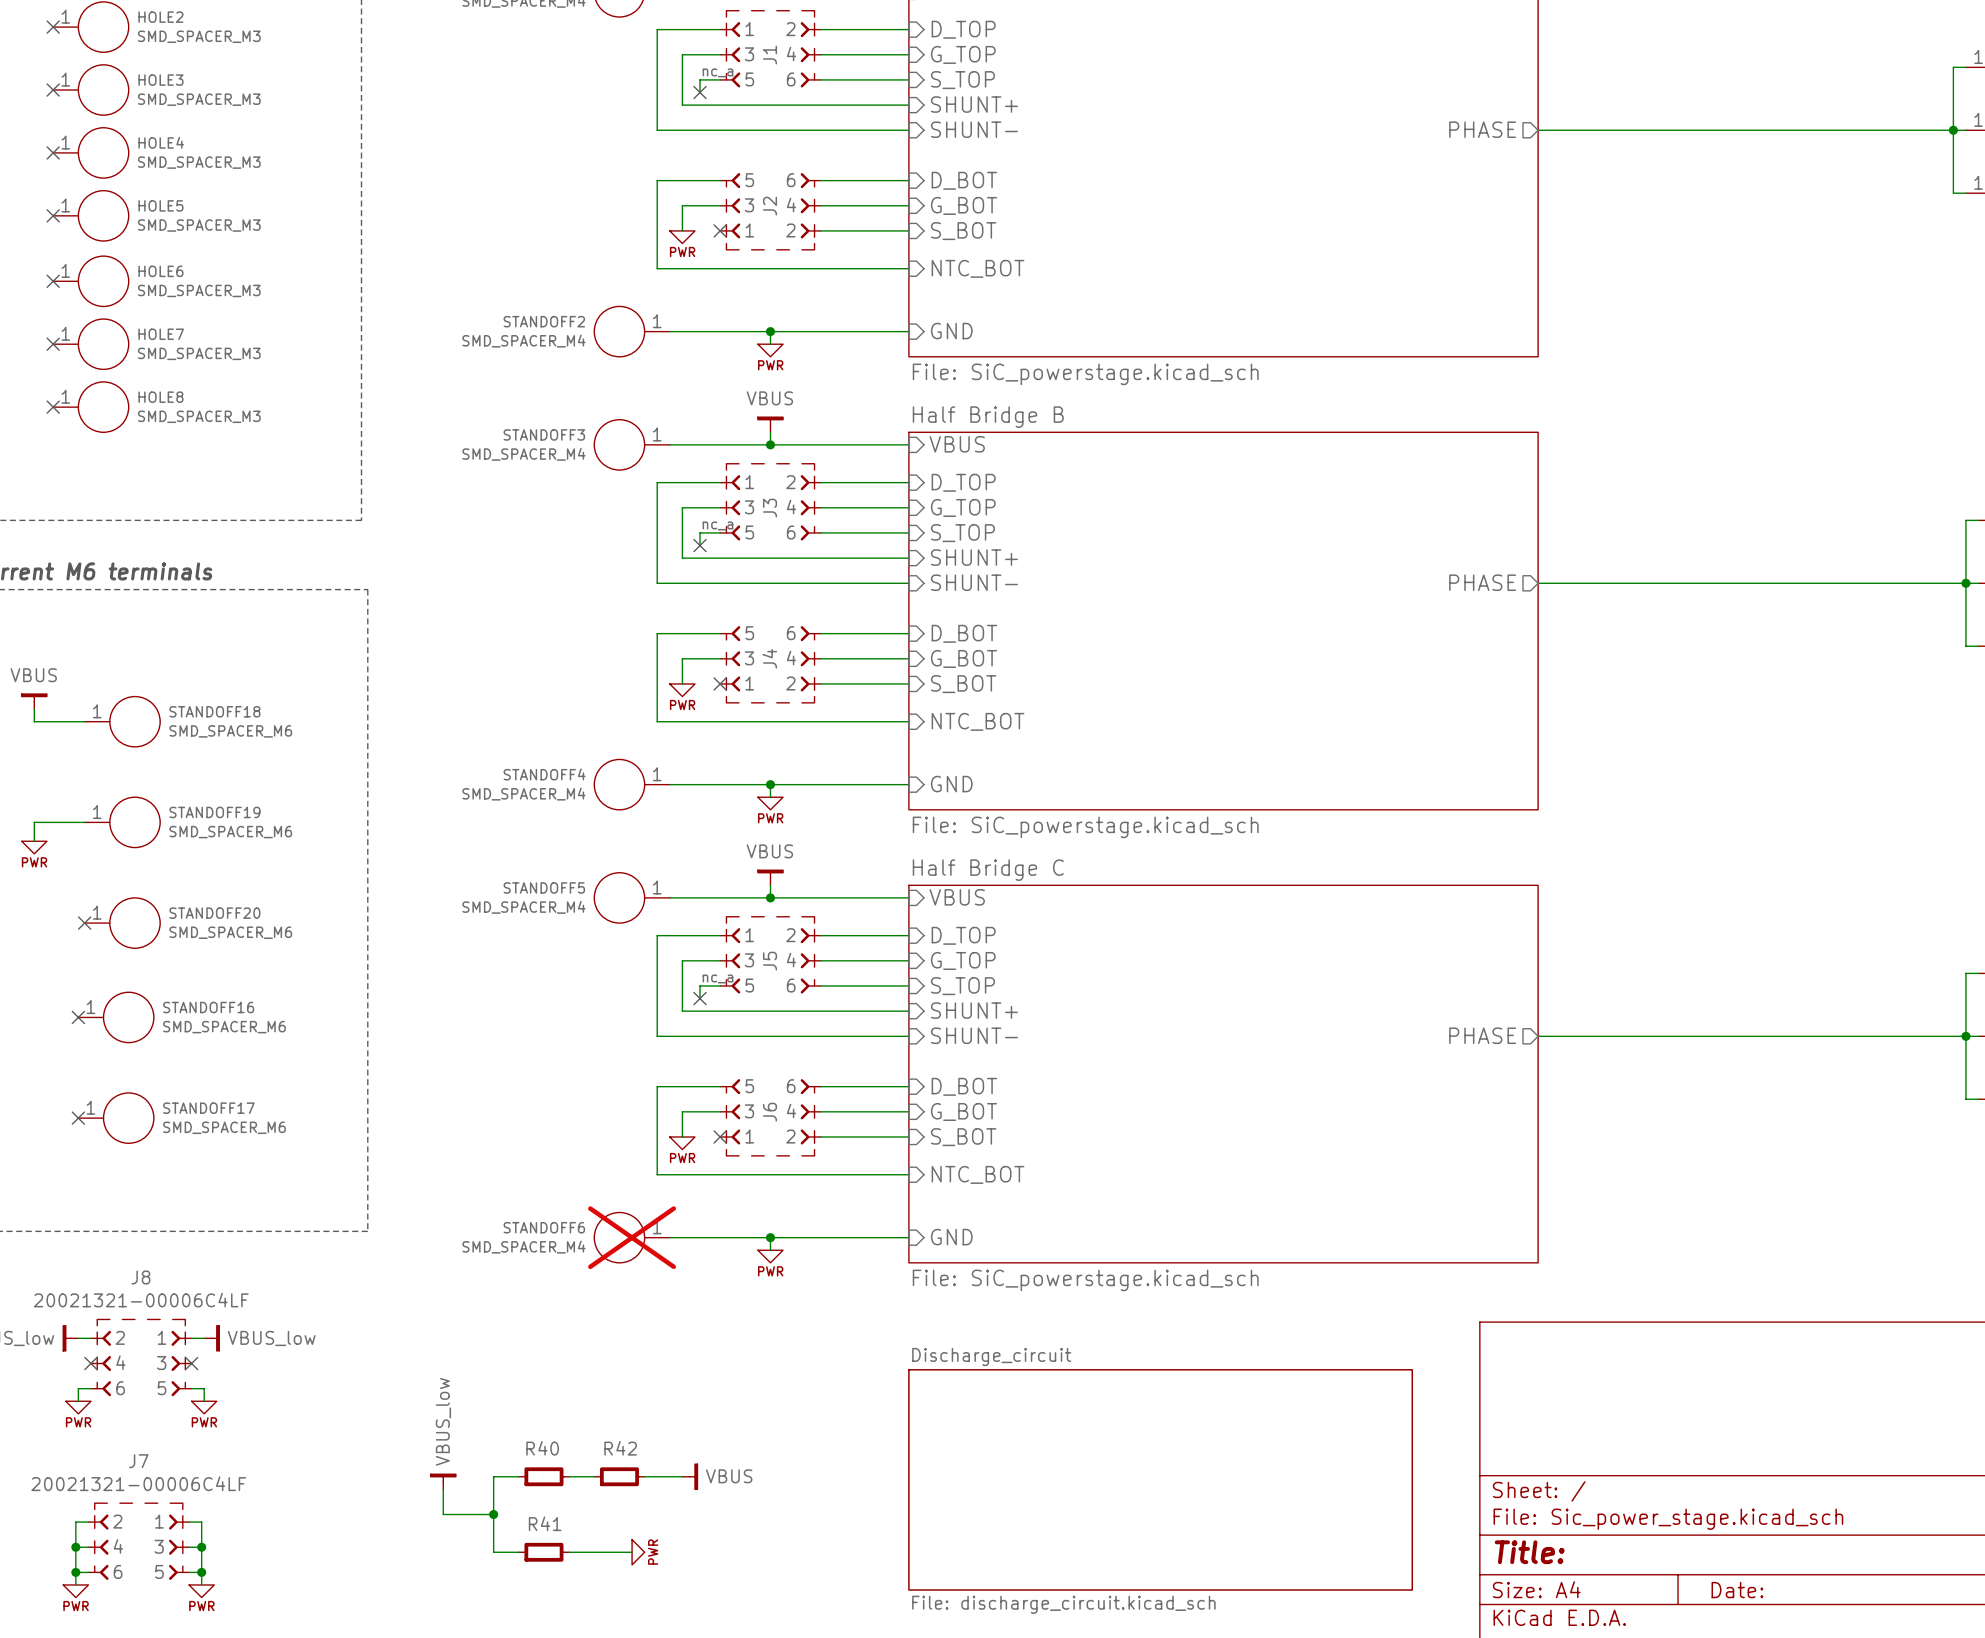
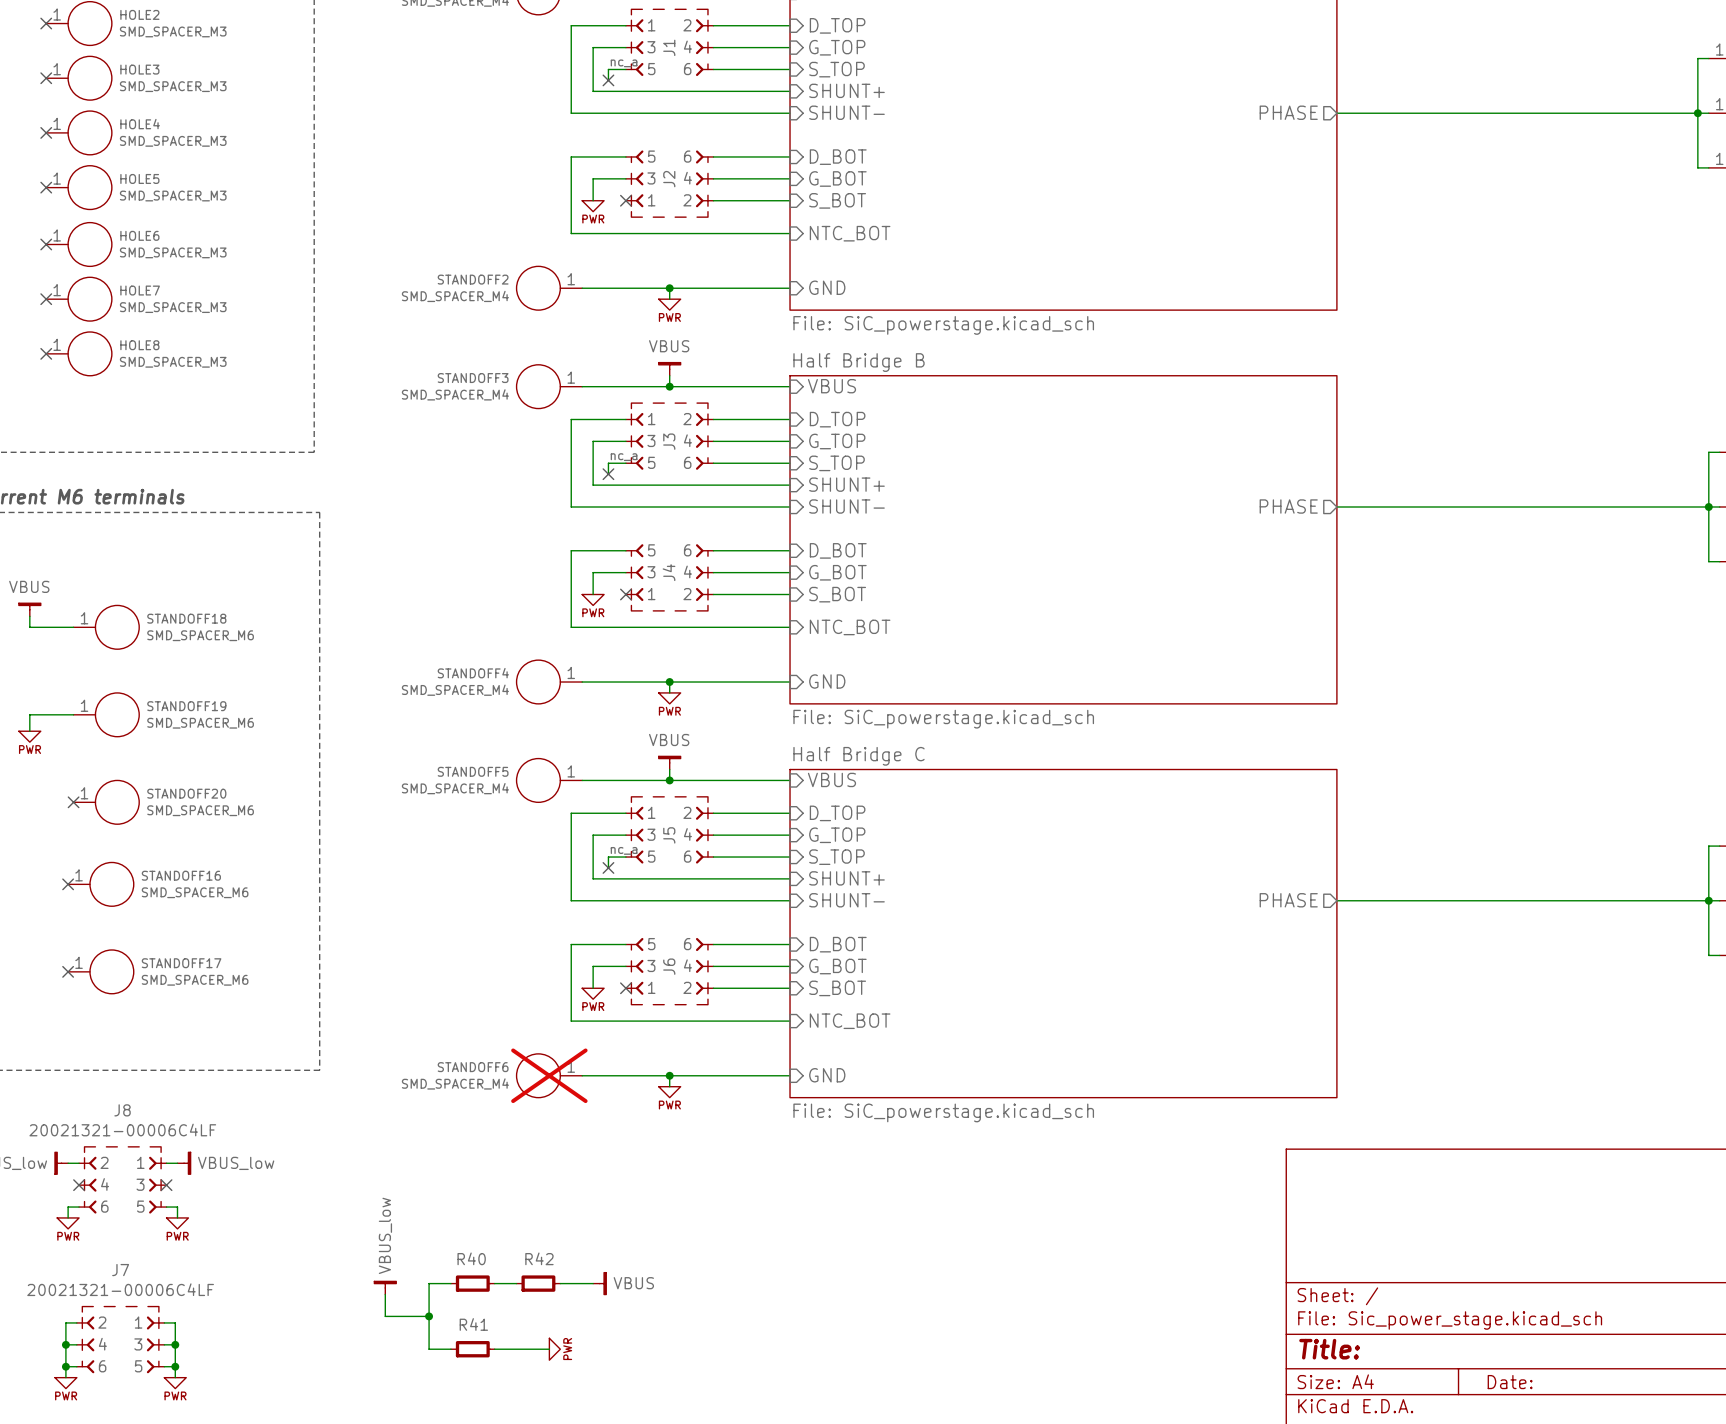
sheet Discharge_circuit: File: discharge_circuit.kicad_sch (1160, 1479) -> none

